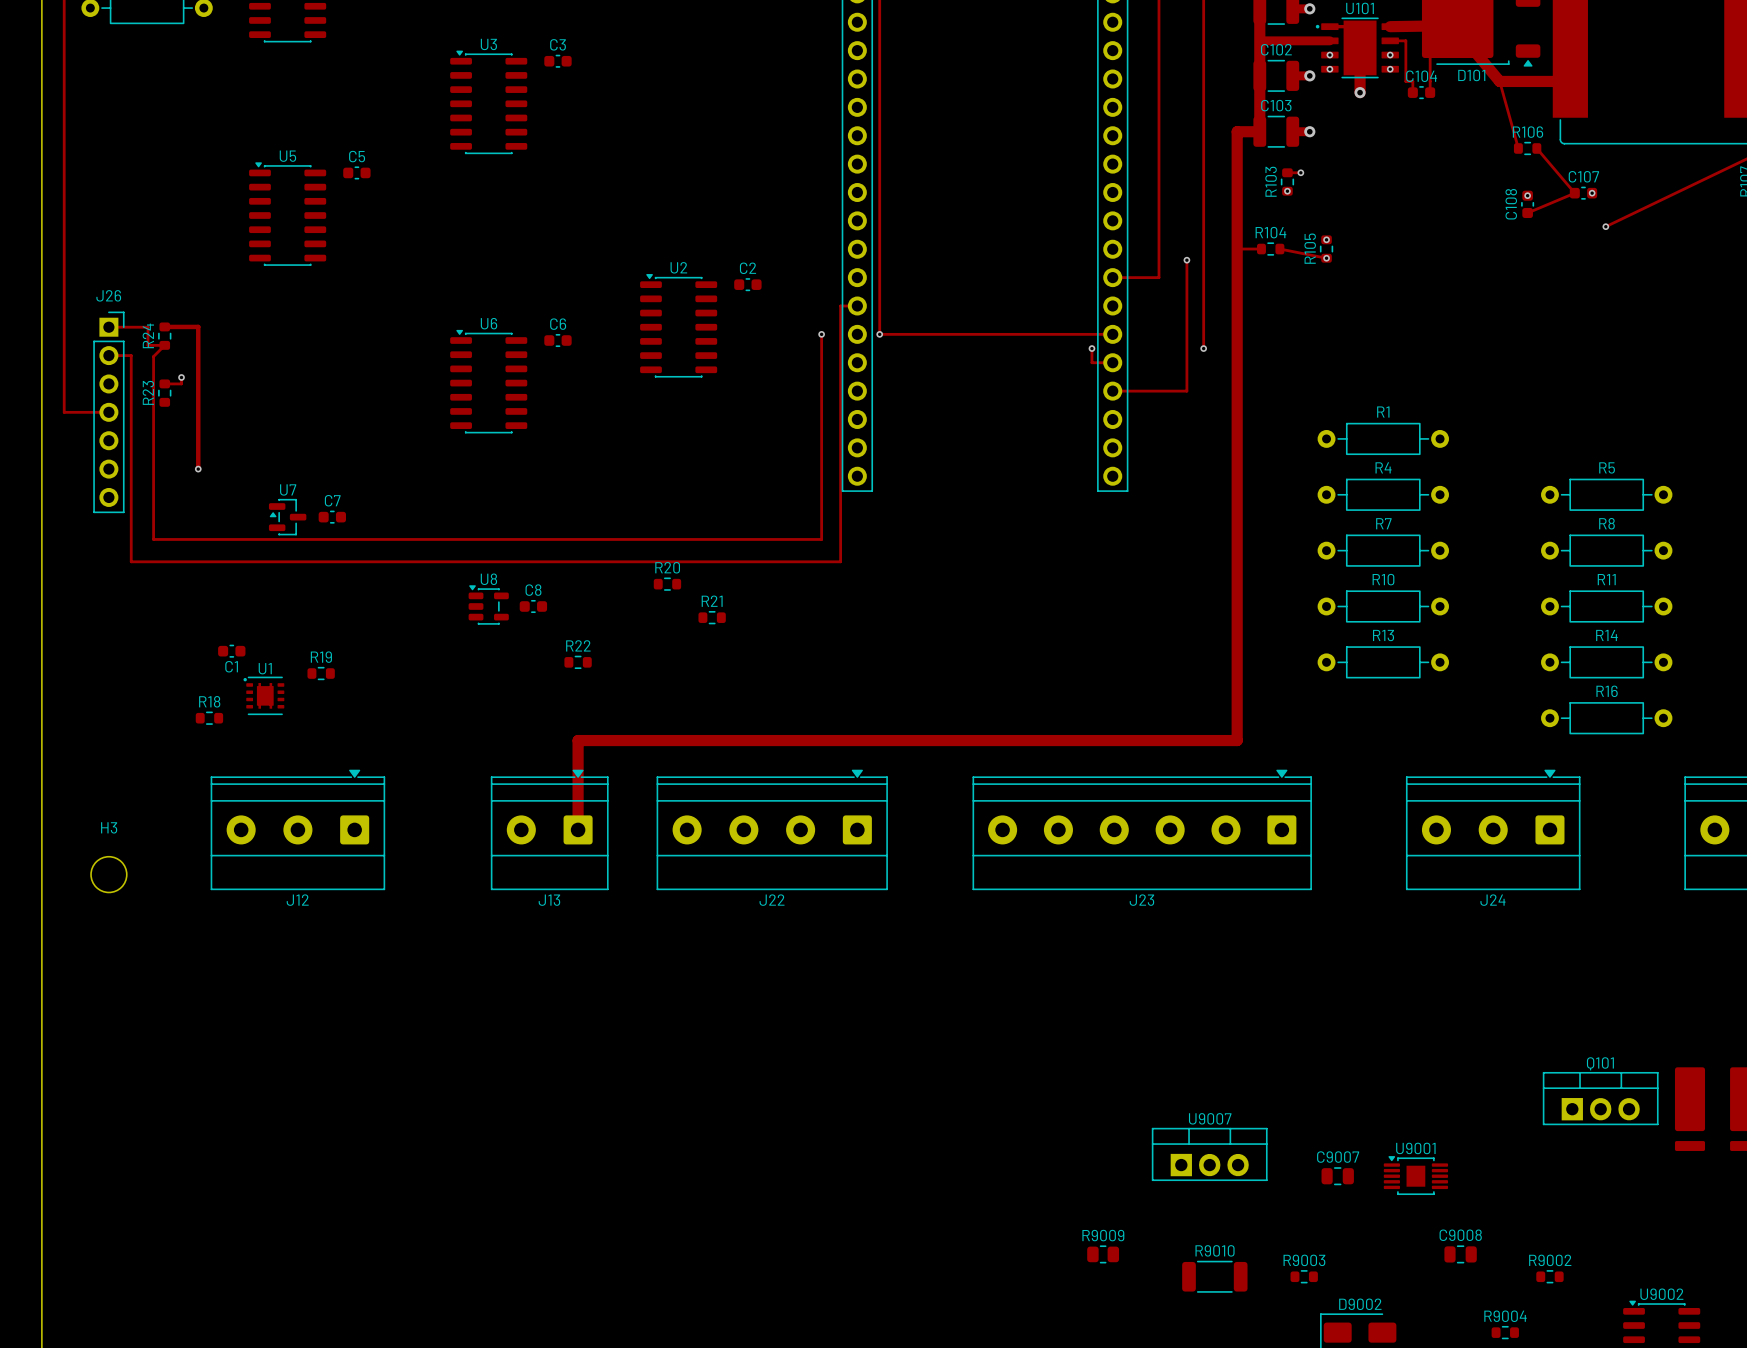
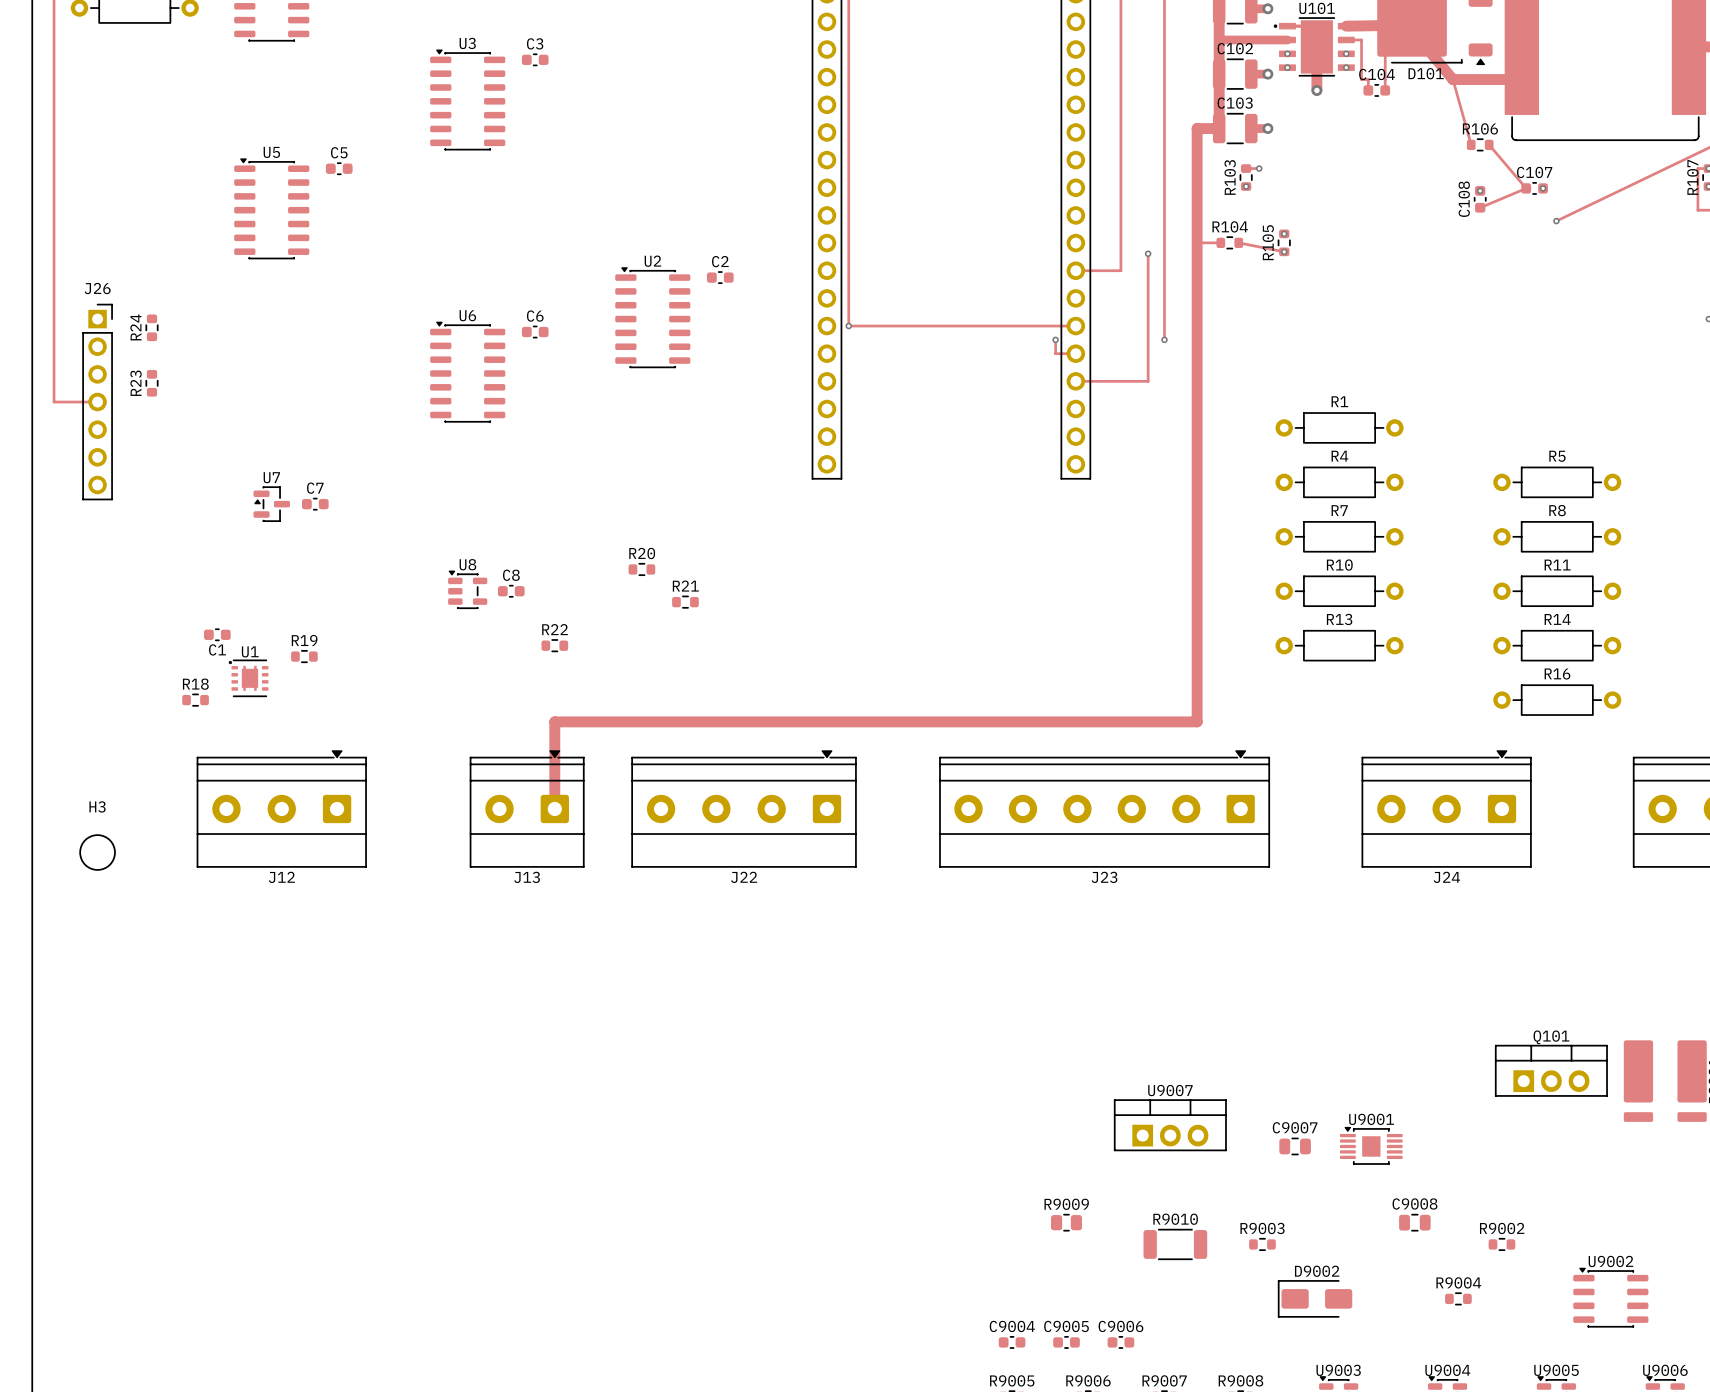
track: (857, 305) (840, 305) (840, 561) (131, 561) (131, 355) (108, 355) -> none
track: (164, 326) (198, 326) (198, 469) -> none
track: (108, 327) (148, 327) (148, 345) (164, 345) (153, 356) (153, 539) (821, 539) (821, 334) -> none
via: (821, 334) -> none
track: (181, 377) (181, 383) (164, 383) -> none
via: (181, 377) -> none
via: (198, 469) -> none

